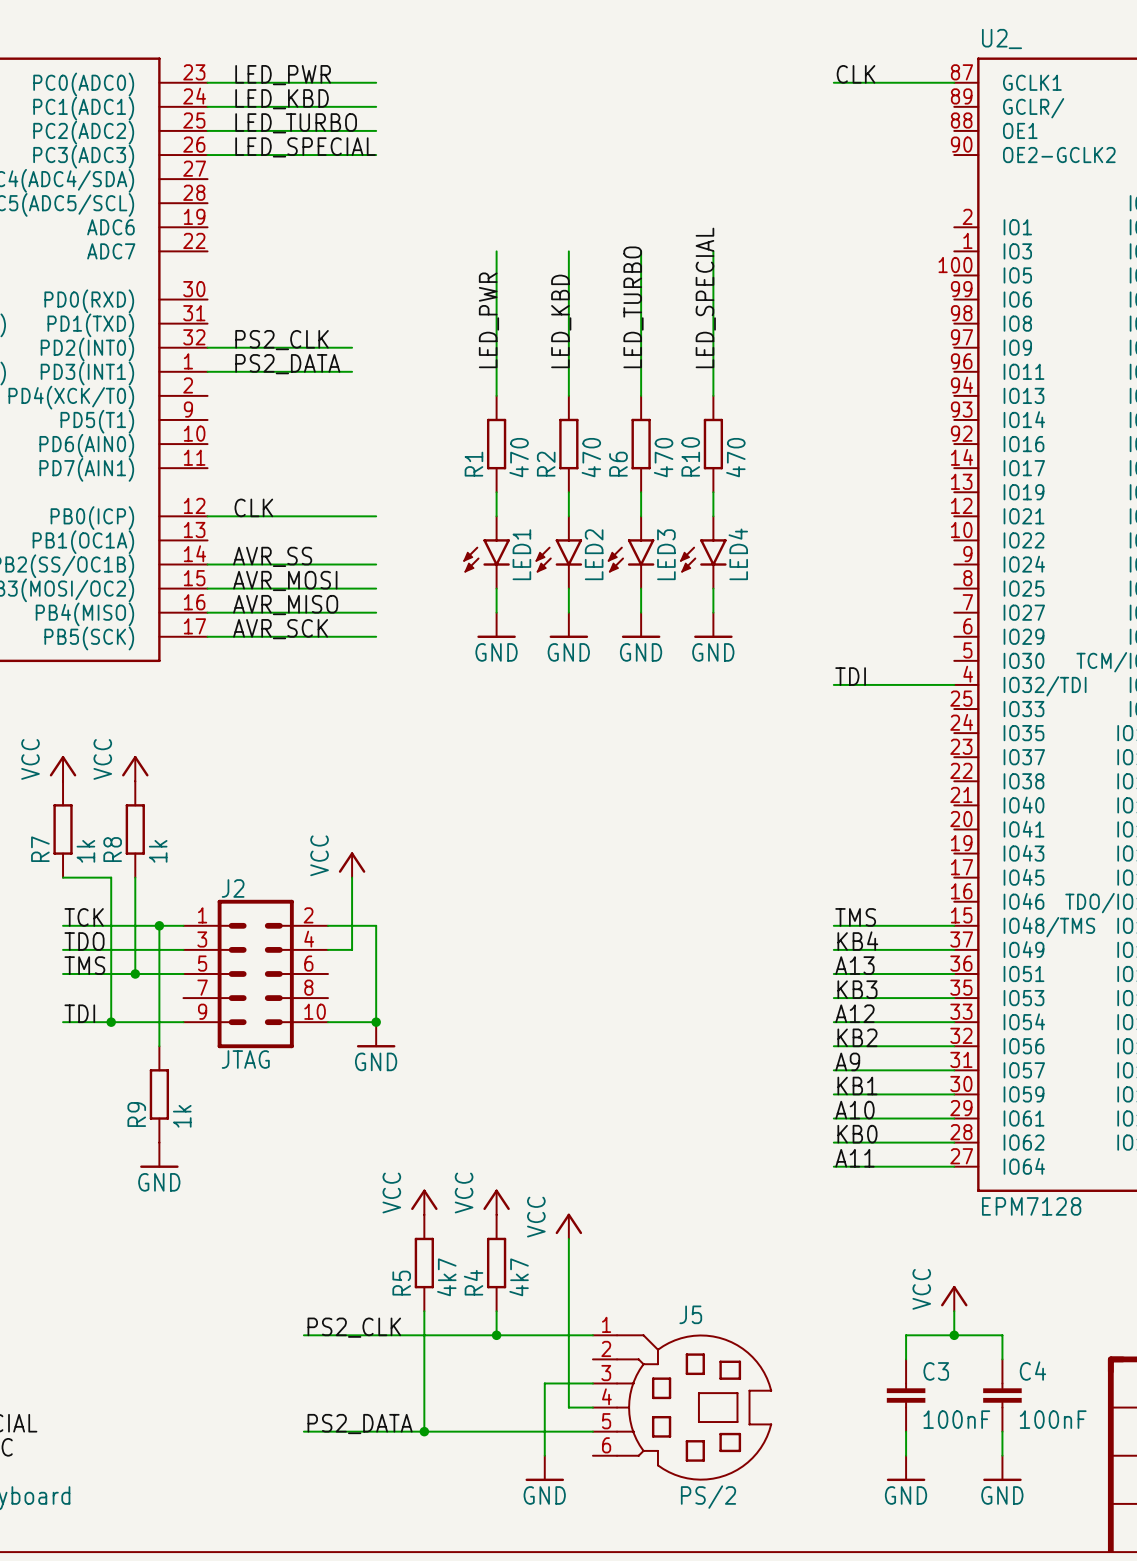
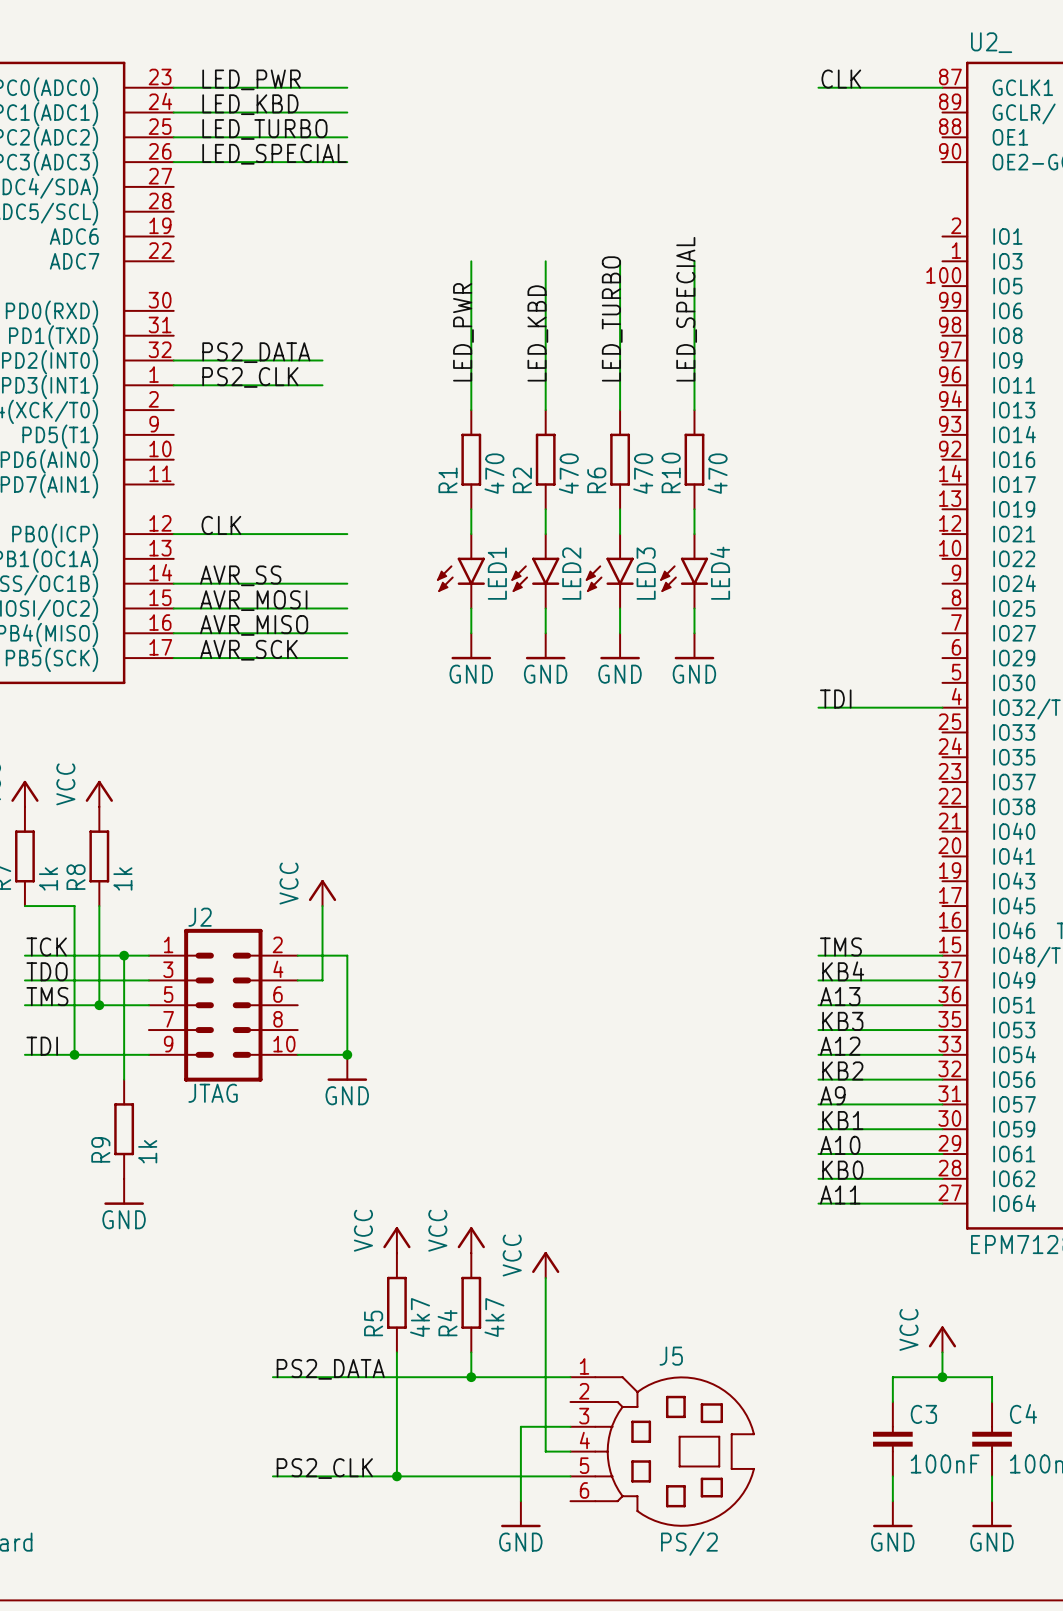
label: PS2_CLK (282, 340) -> PS2_DATA (256, 352)
label: PS2_DATA (287, 364) -> PS2_CLK (250, 377)
label: PS2_CLK (354, 1327) -> PS2_DATA (330, 1369)
label: PS2_DATA (360, 1424) -> PS2_CLK (324, 1468)

